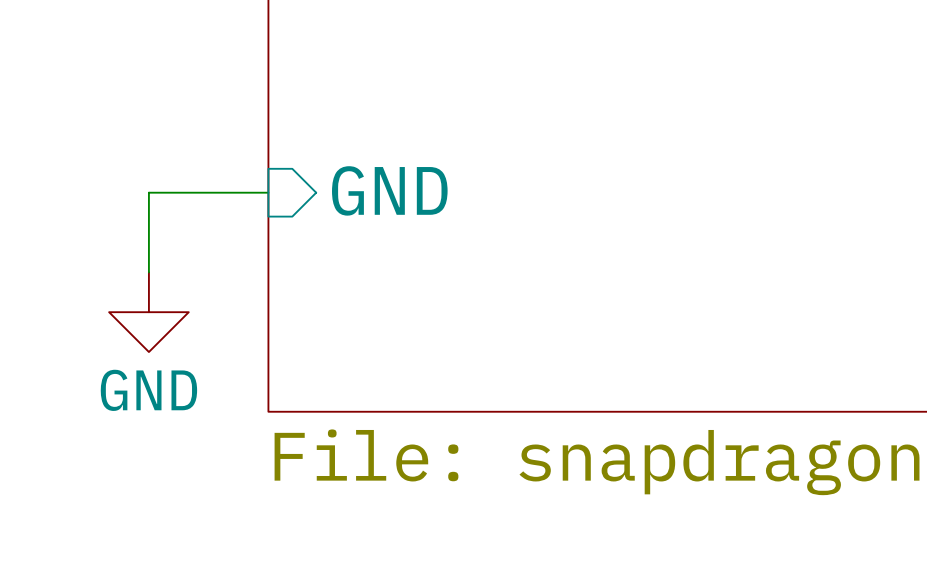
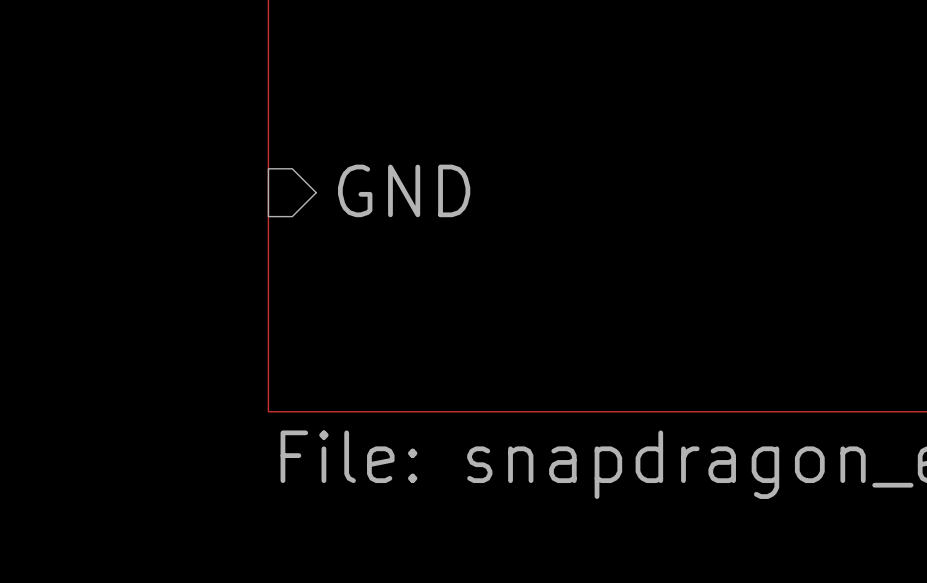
wire: (268, 192) (148, 192) (148, 272) -> none
power symbol: GND (148, 312) -> none

